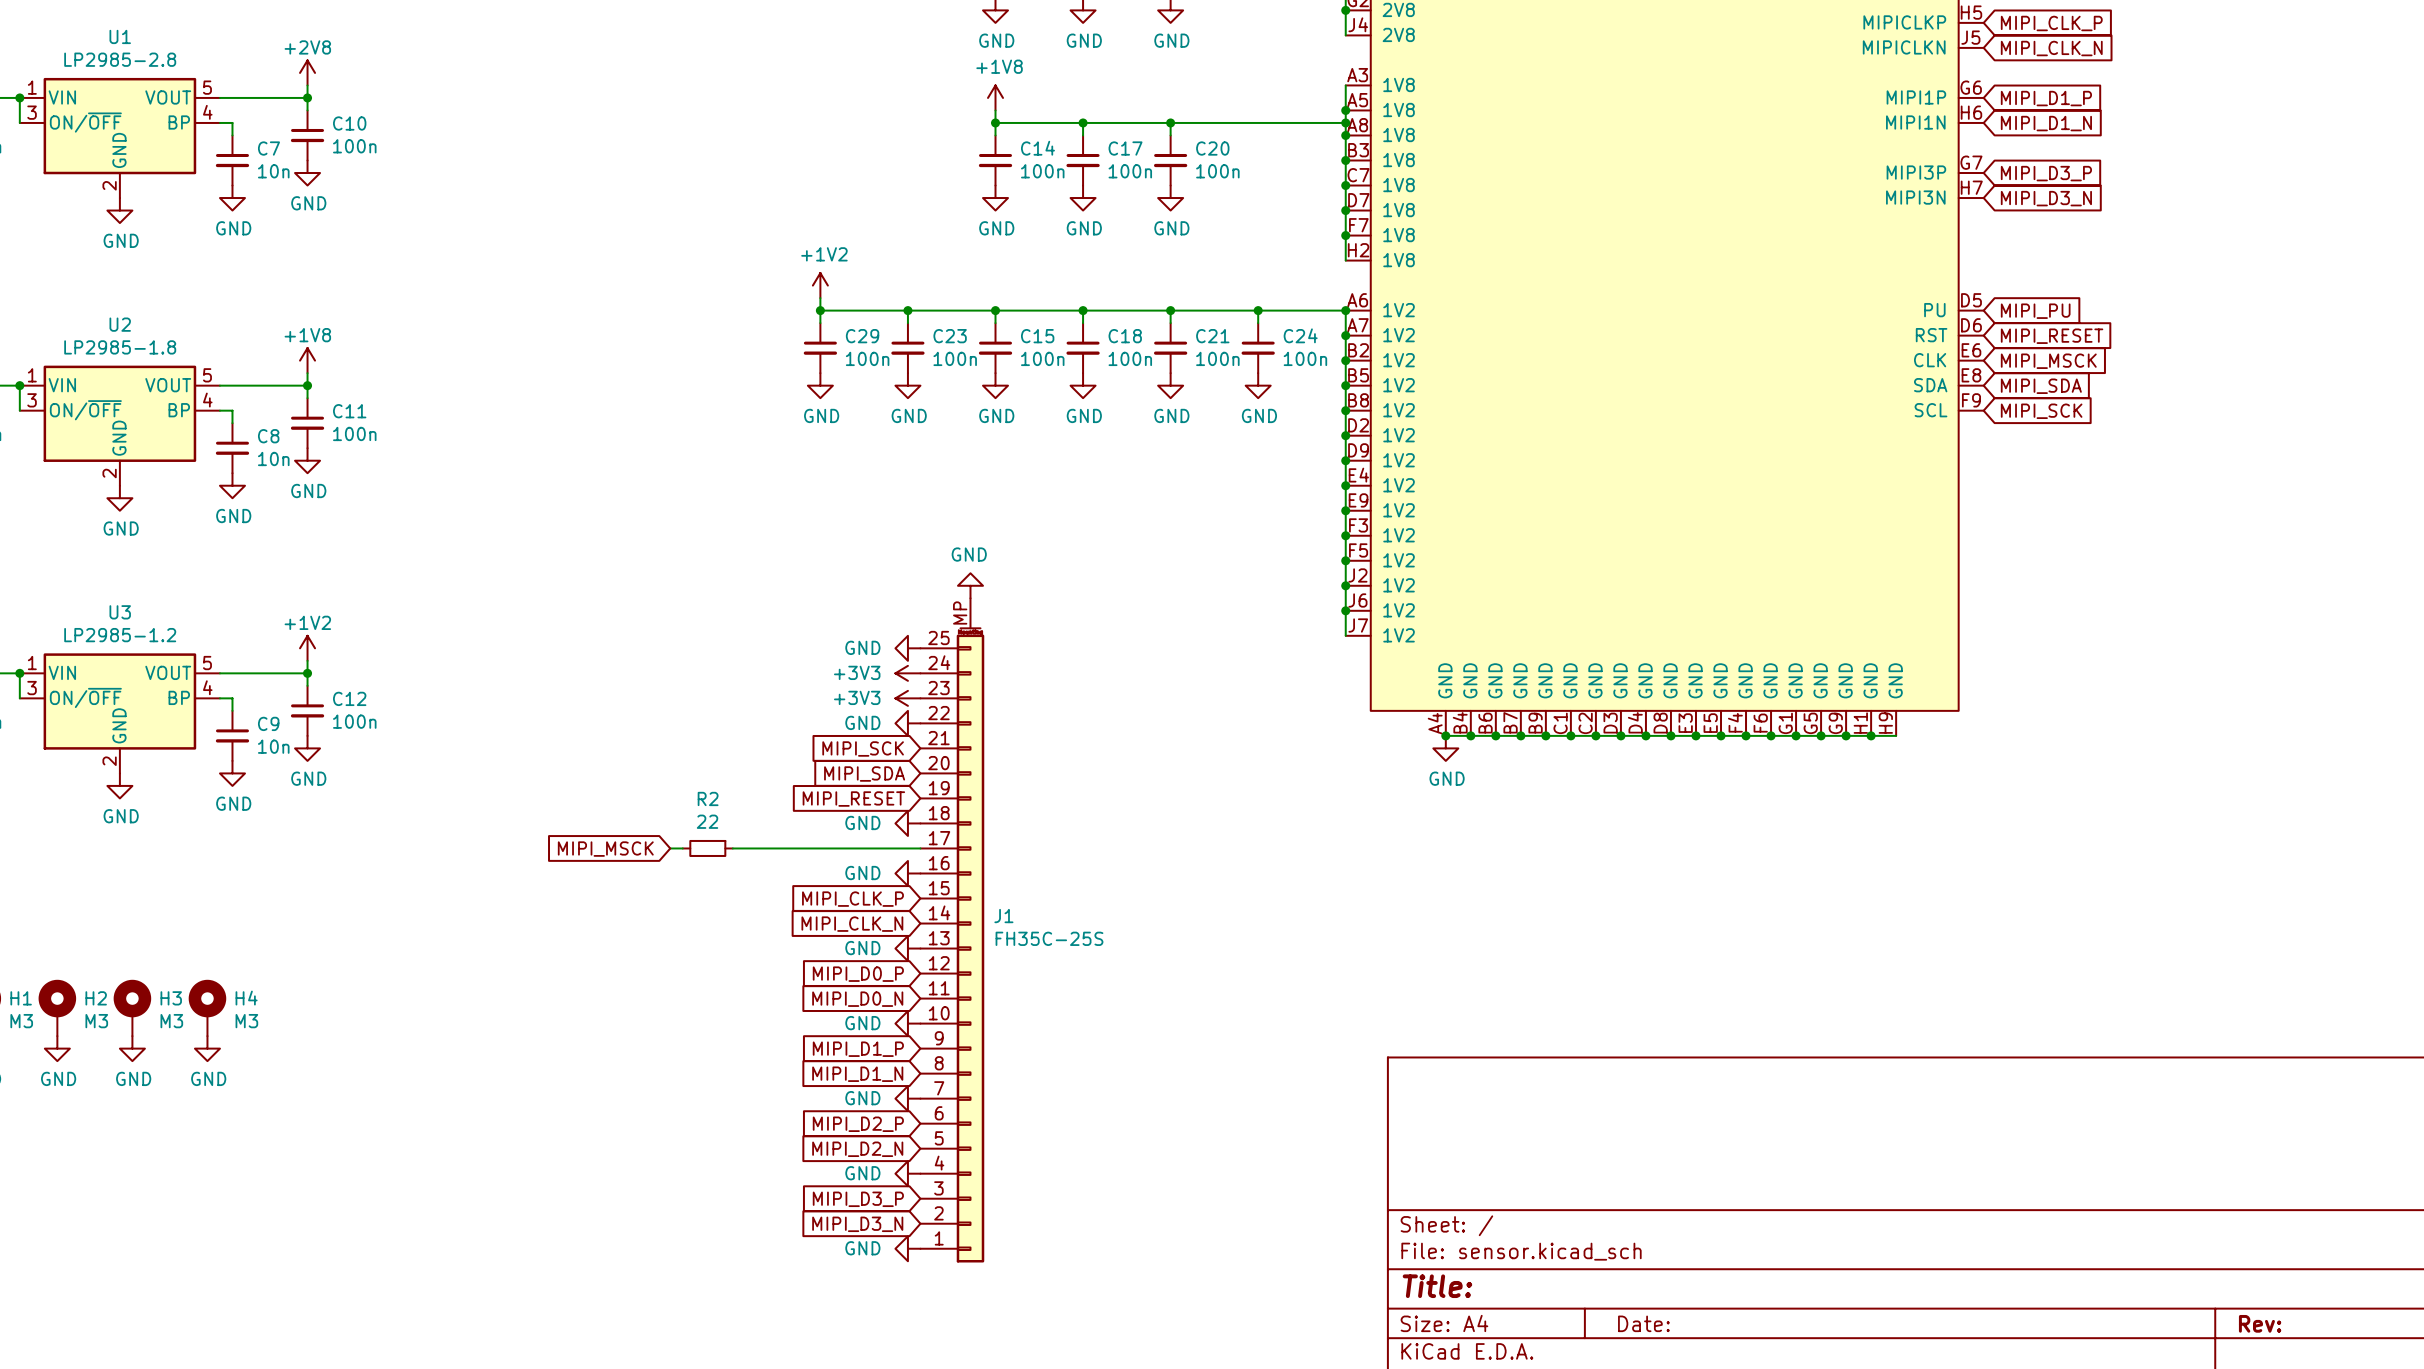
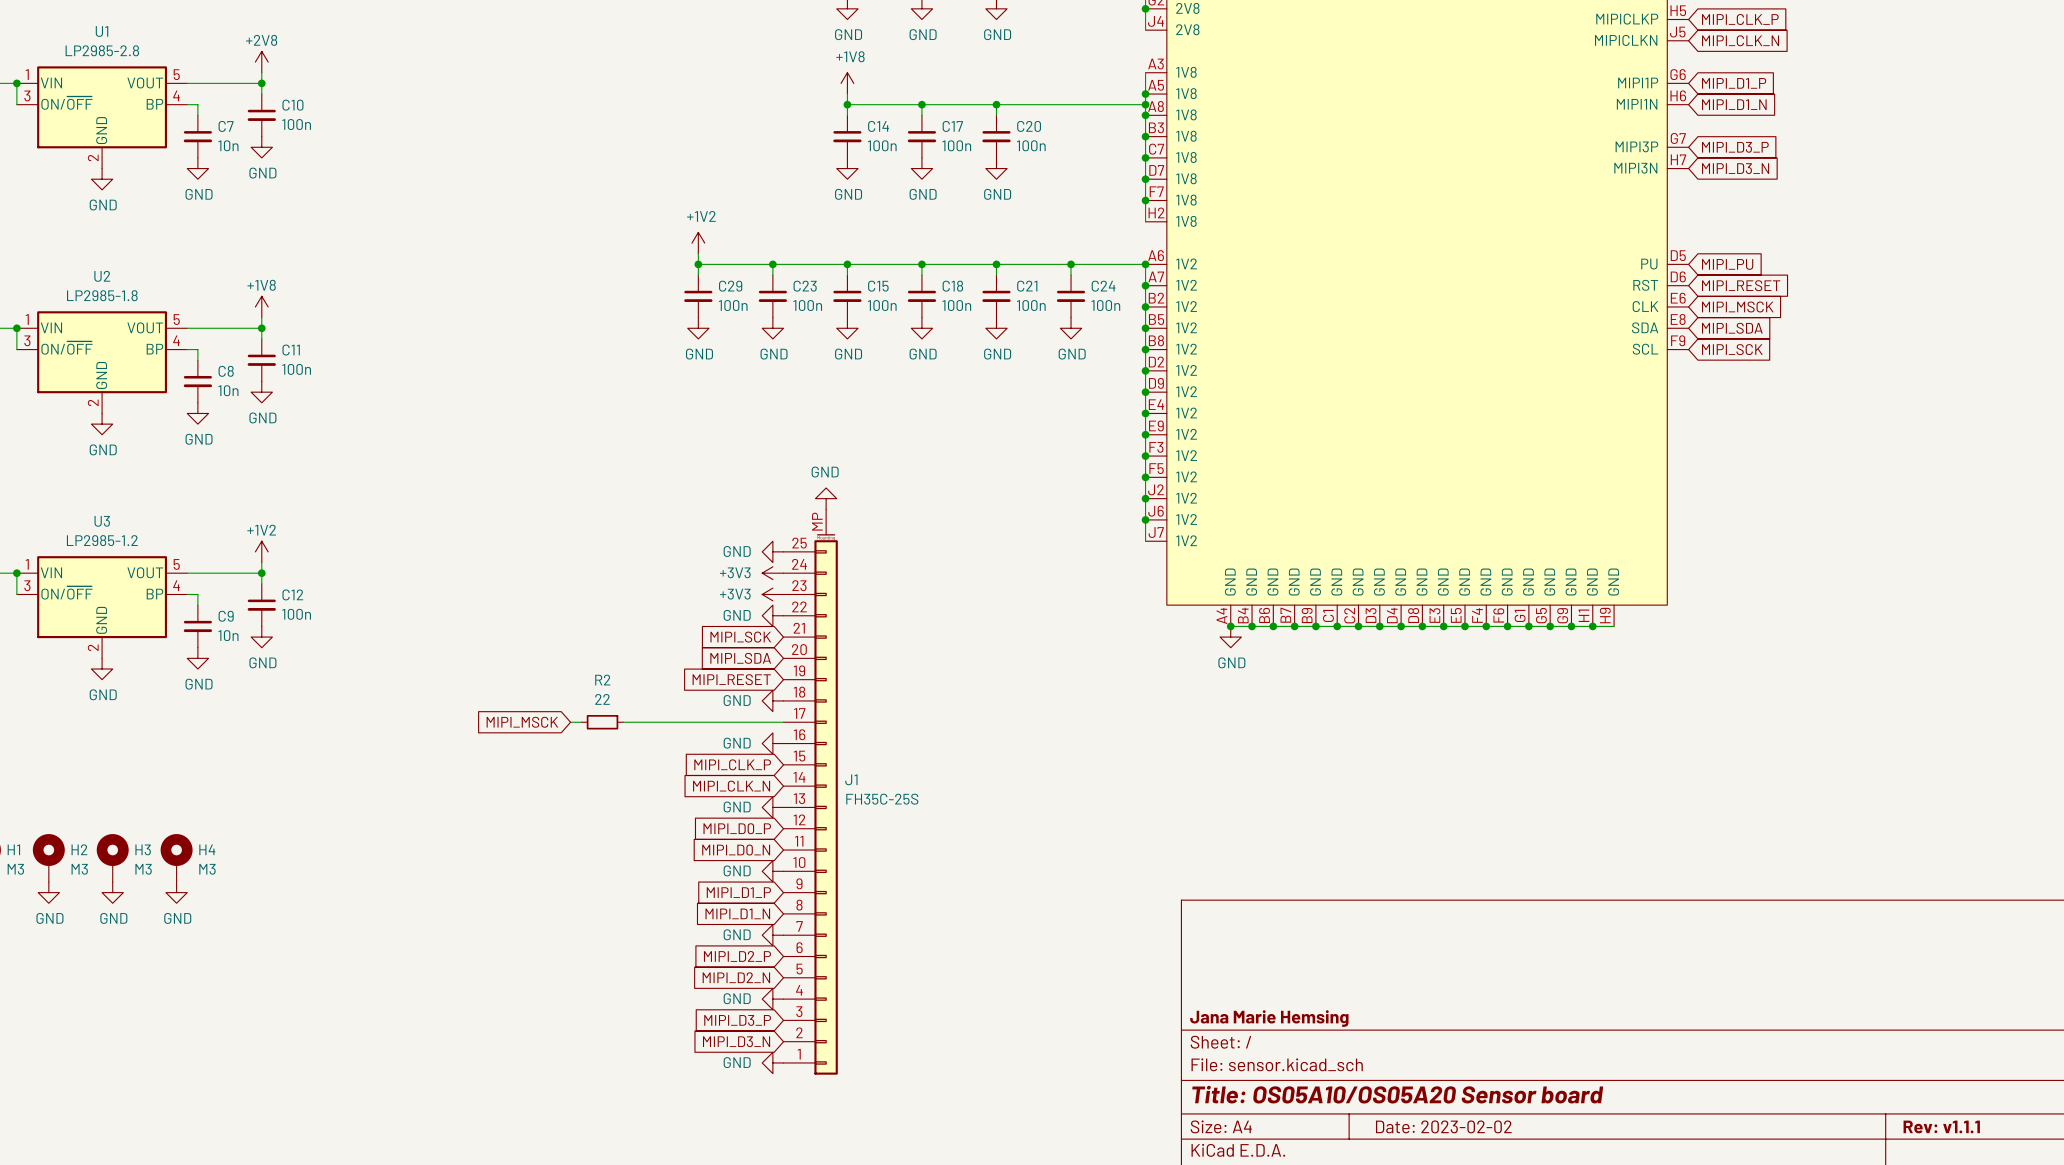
title block: none -> Jana Marie Hemsing (1269, 1018)
title block: Title: (1437, 1286) -> Title: OS05A10/OS05A20 Sensor board (1397, 1094)
title block: Date: (1643, 1323) -> Date: 2023-02-02 (1443, 1126)
title block: Rev: (2260, 1323) -> Rev: v1.1.1 (1941, 1126)

